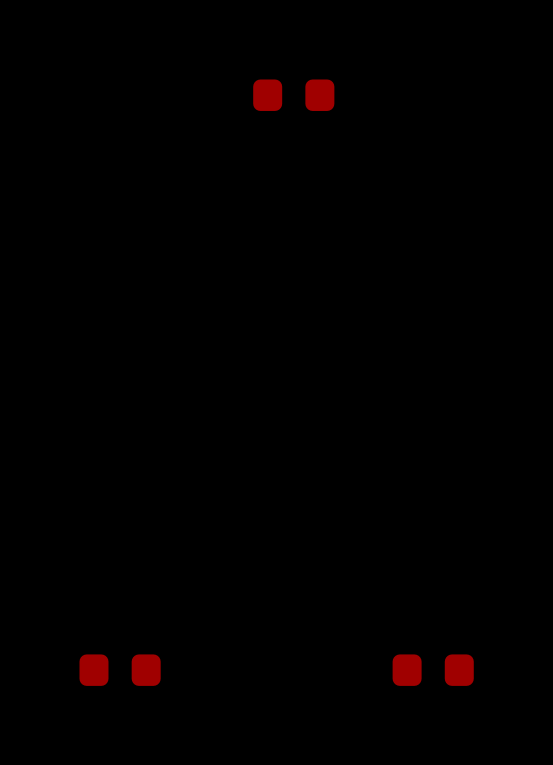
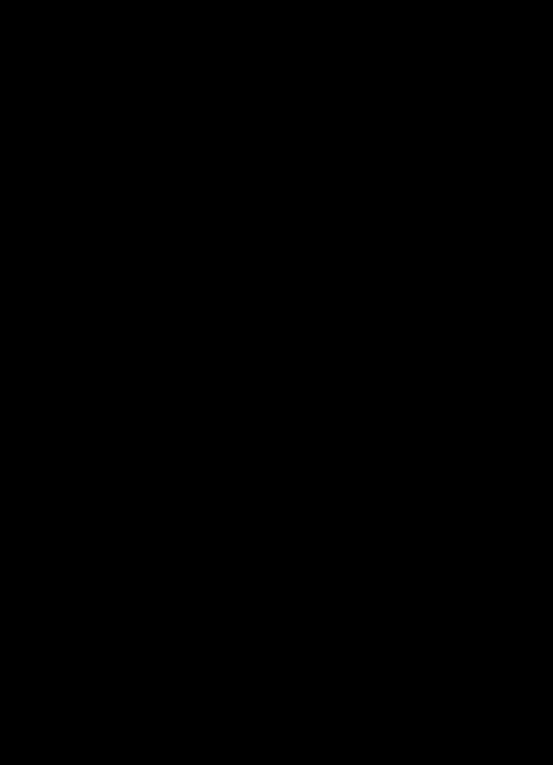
part: (293, 95) -> none
part: (120, 670) -> none
part: (433, 670) -> none

